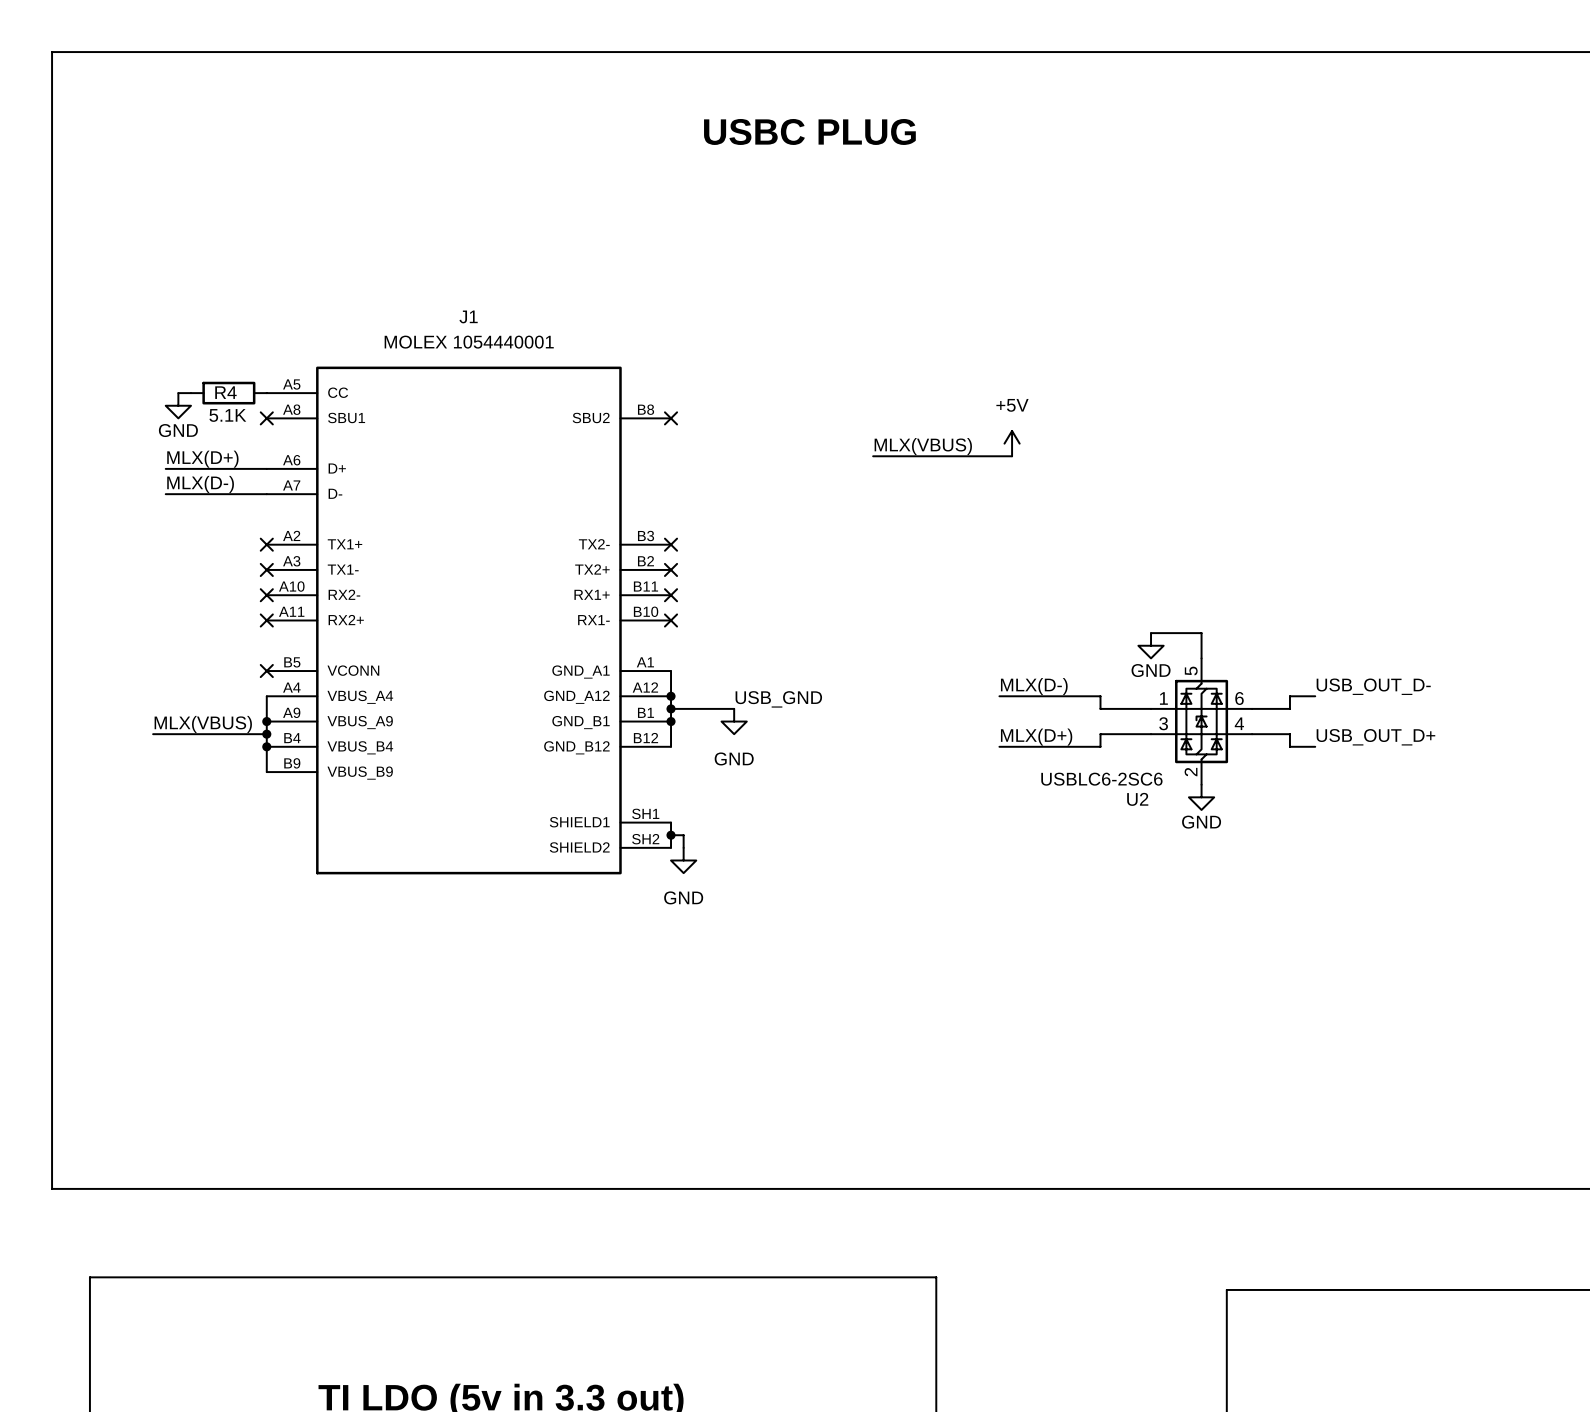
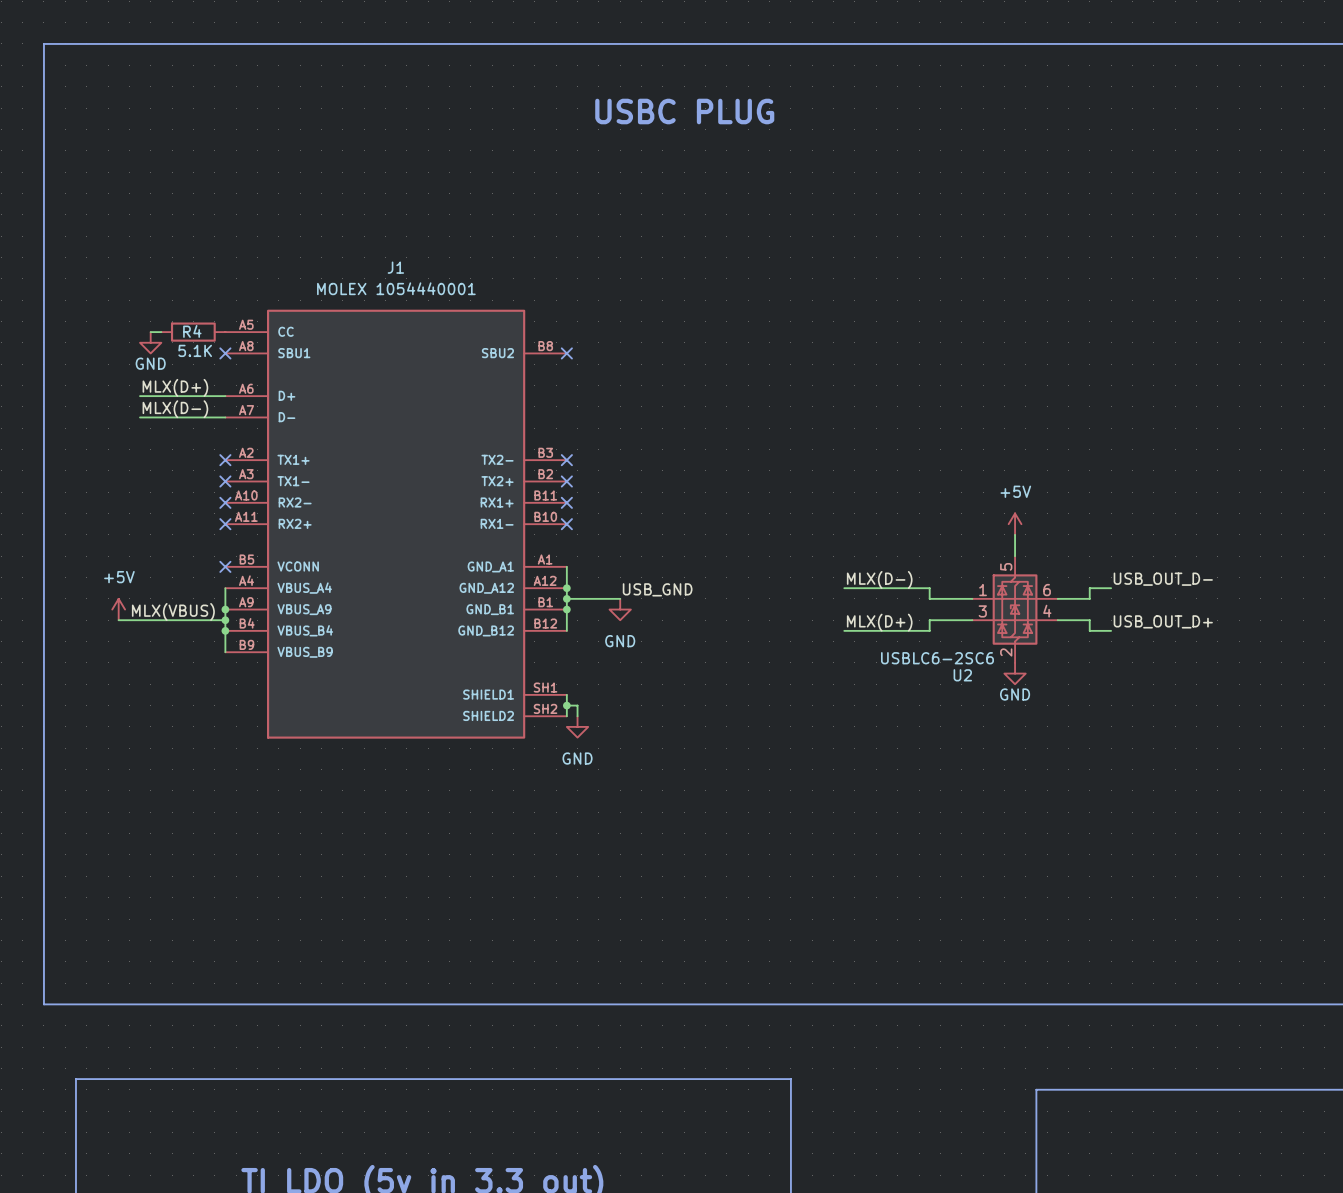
power symbol: +5V (1012, 443) -> none
label: MLX(VBUS) (923, 446) -> none
wire: (873, 456) (1012, 456) -> none
power symbol: none -> +5V (1015, 524)
wire: (1151, 633) (1201, 633) -> none
power symbol: GND (1151, 645) -> none
power symbol: none -> +5V (118, 609)
wire: none -> (118, 620) (129, 620)

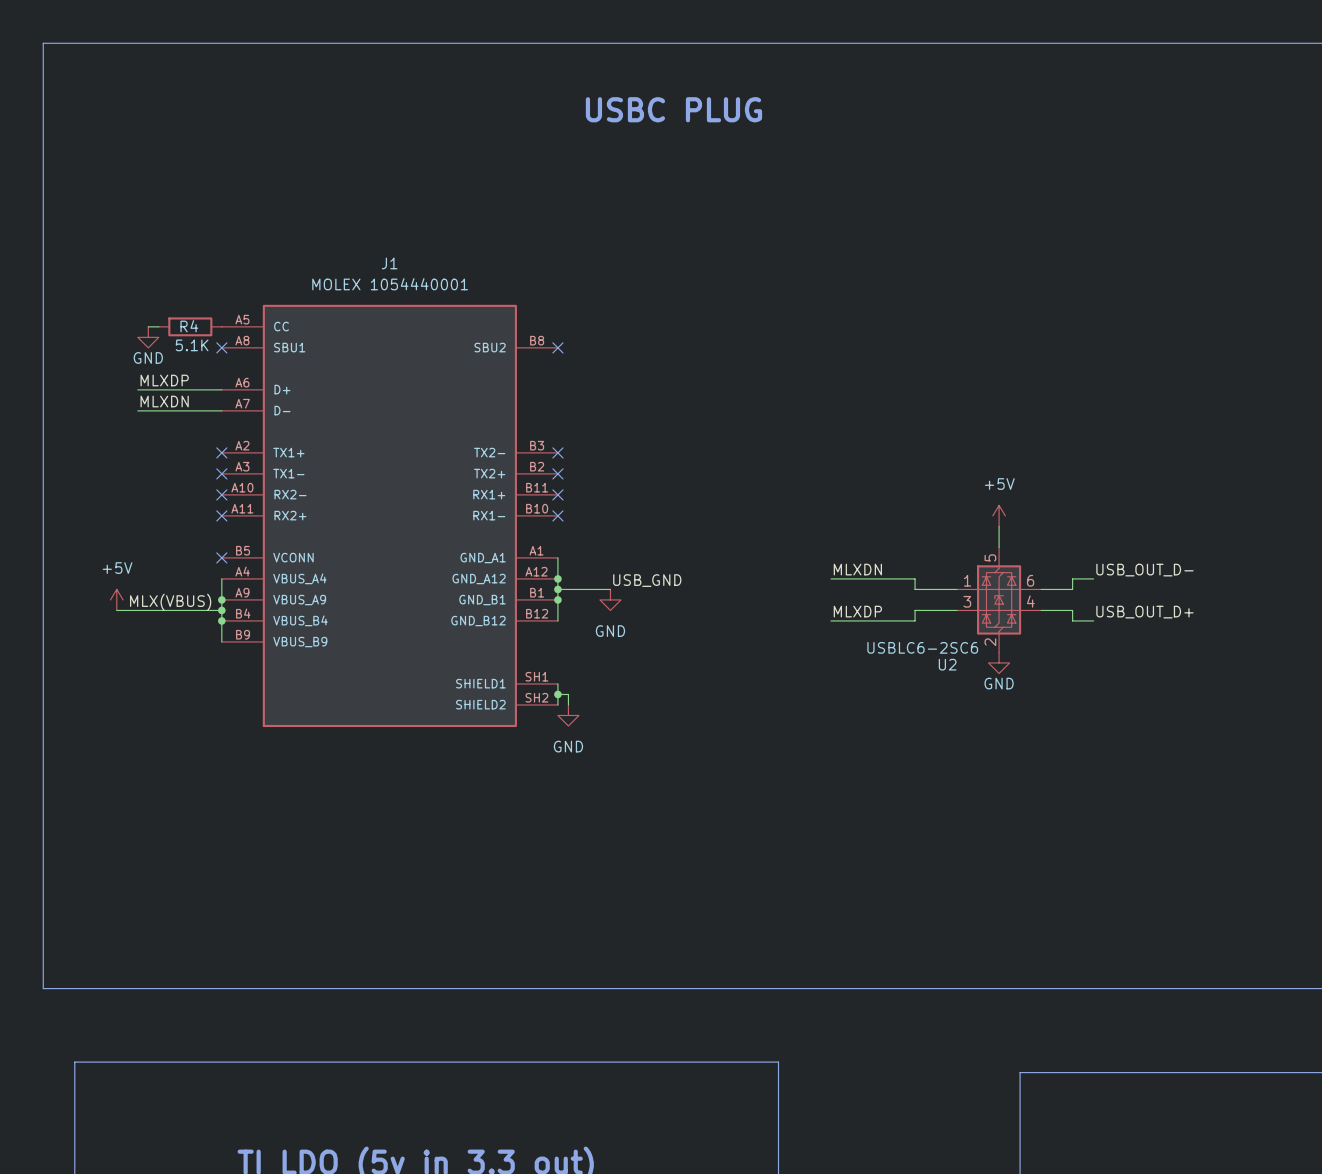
label: MLX(D+) (175, 387) -> MLXDP (164, 380)
label: MLX(D-) (175, 409) -> MLXDN (164, 401)
label: MLX(D-) (879, 579) -> MLXDN (857, 569)
label: MLX(D+) (879, 622) -> MLXDP (857, 611)

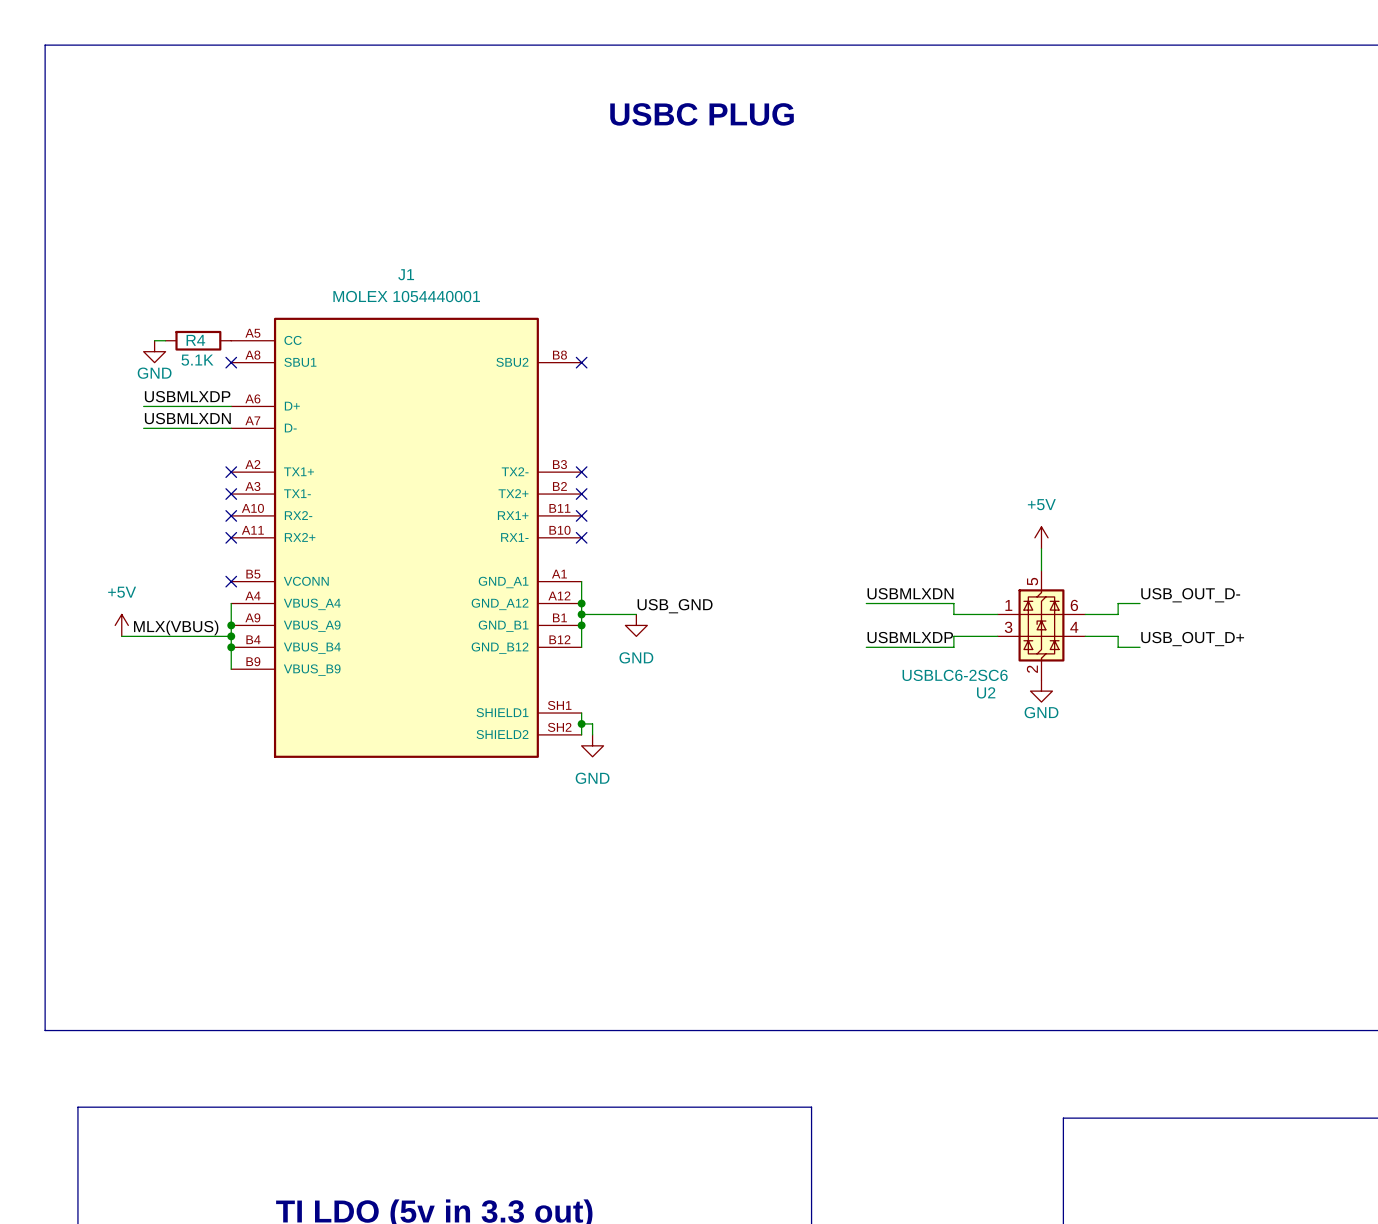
label: MLXDP (164, 380) -> USBMLXDP (187, 396)
label: MLXDN (164, 401) -> USBMLXDN (187, 418)
label: MLXDN (857, 569) -> USBMLXDN (910, 593)
label: MLXDP (857, 611) -> USBMLXDP (910, 637)

